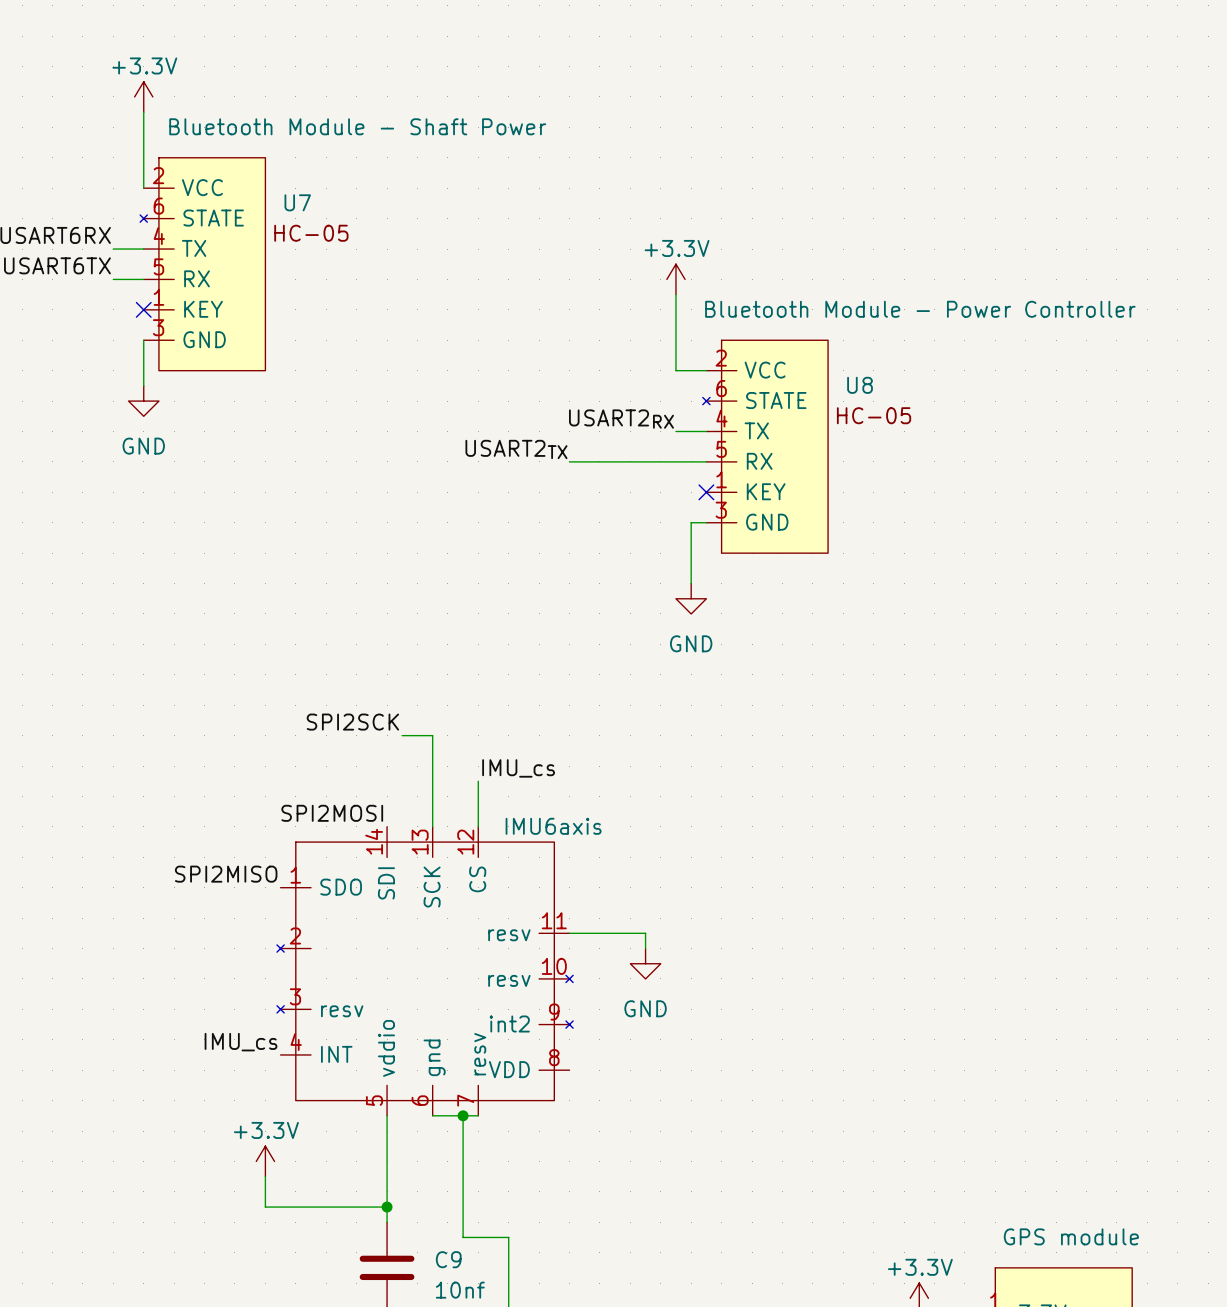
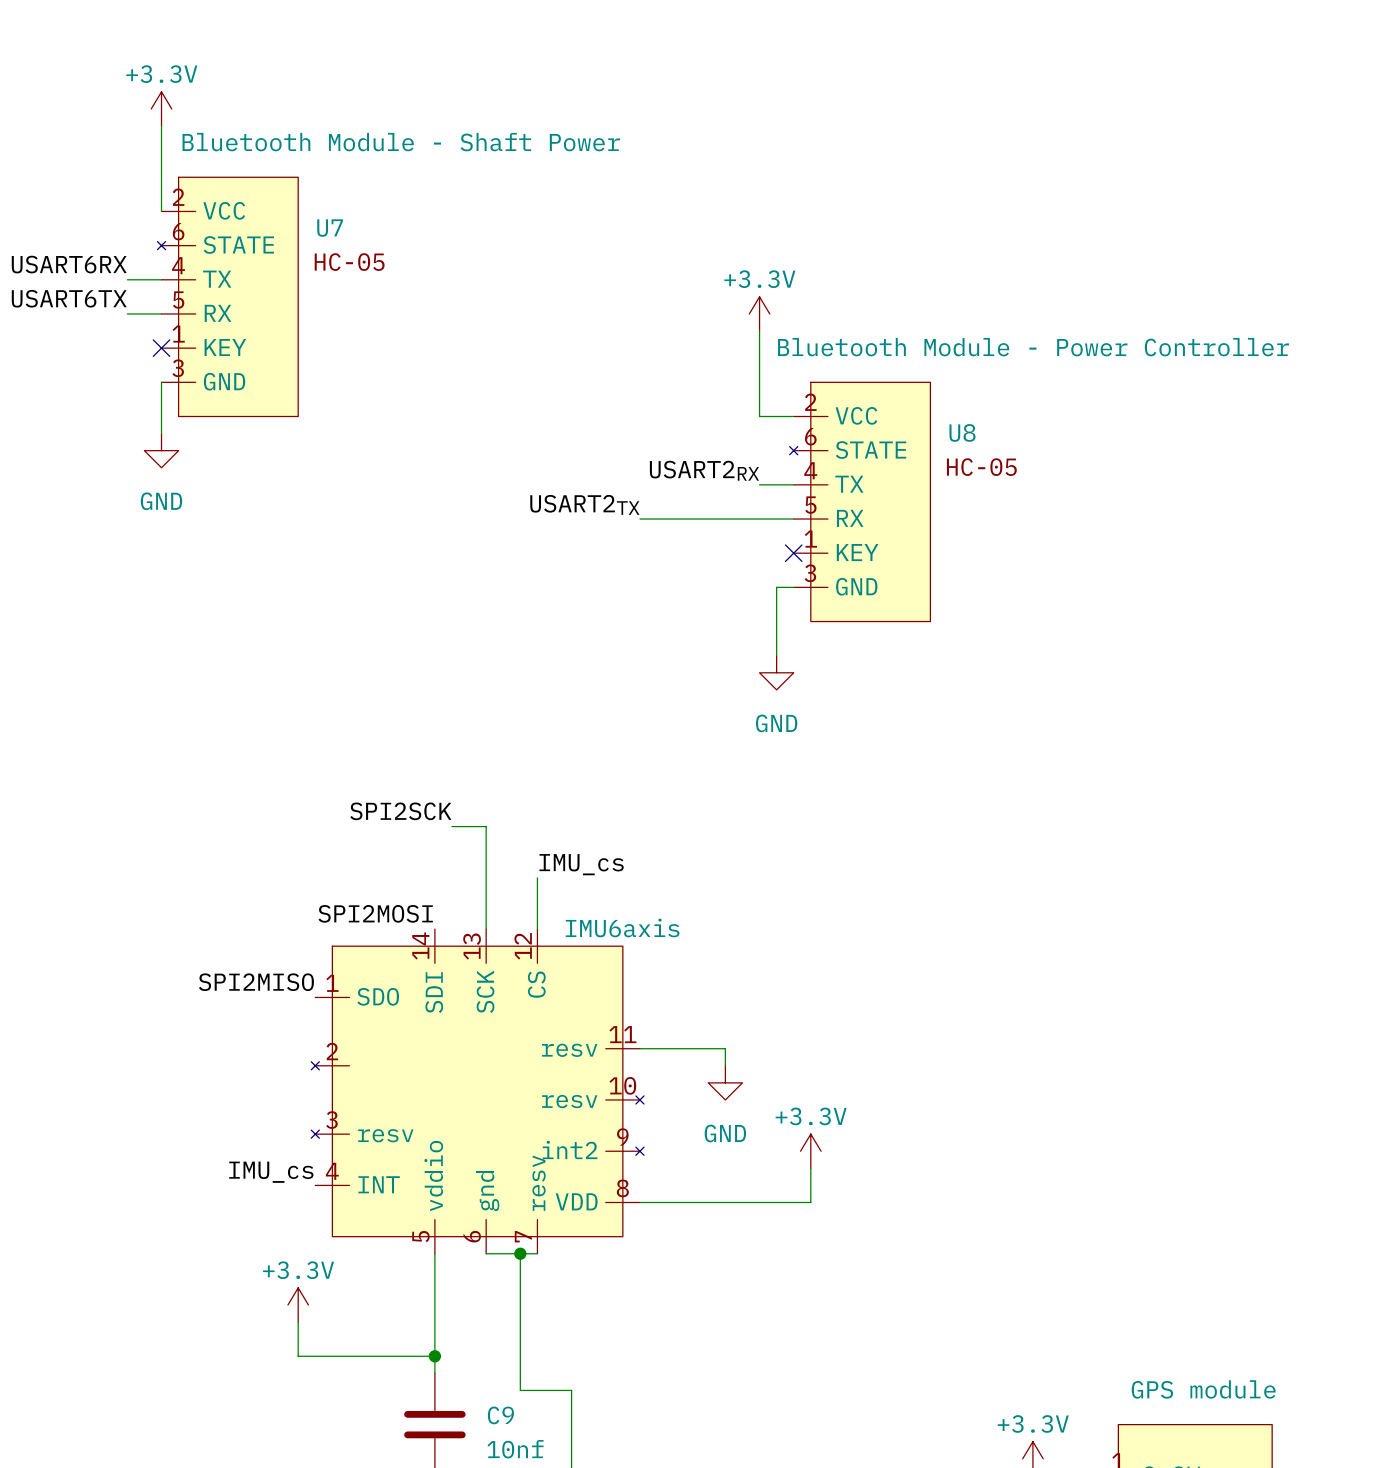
IMU6axis symbol: [277, 826, 574, 1116] -> [311, 929, 644, 1254]
power symbol: none -> +3.3V (810, 1151)
wire: none -> (810, 1168) (810, 1202) (639, 1202)

